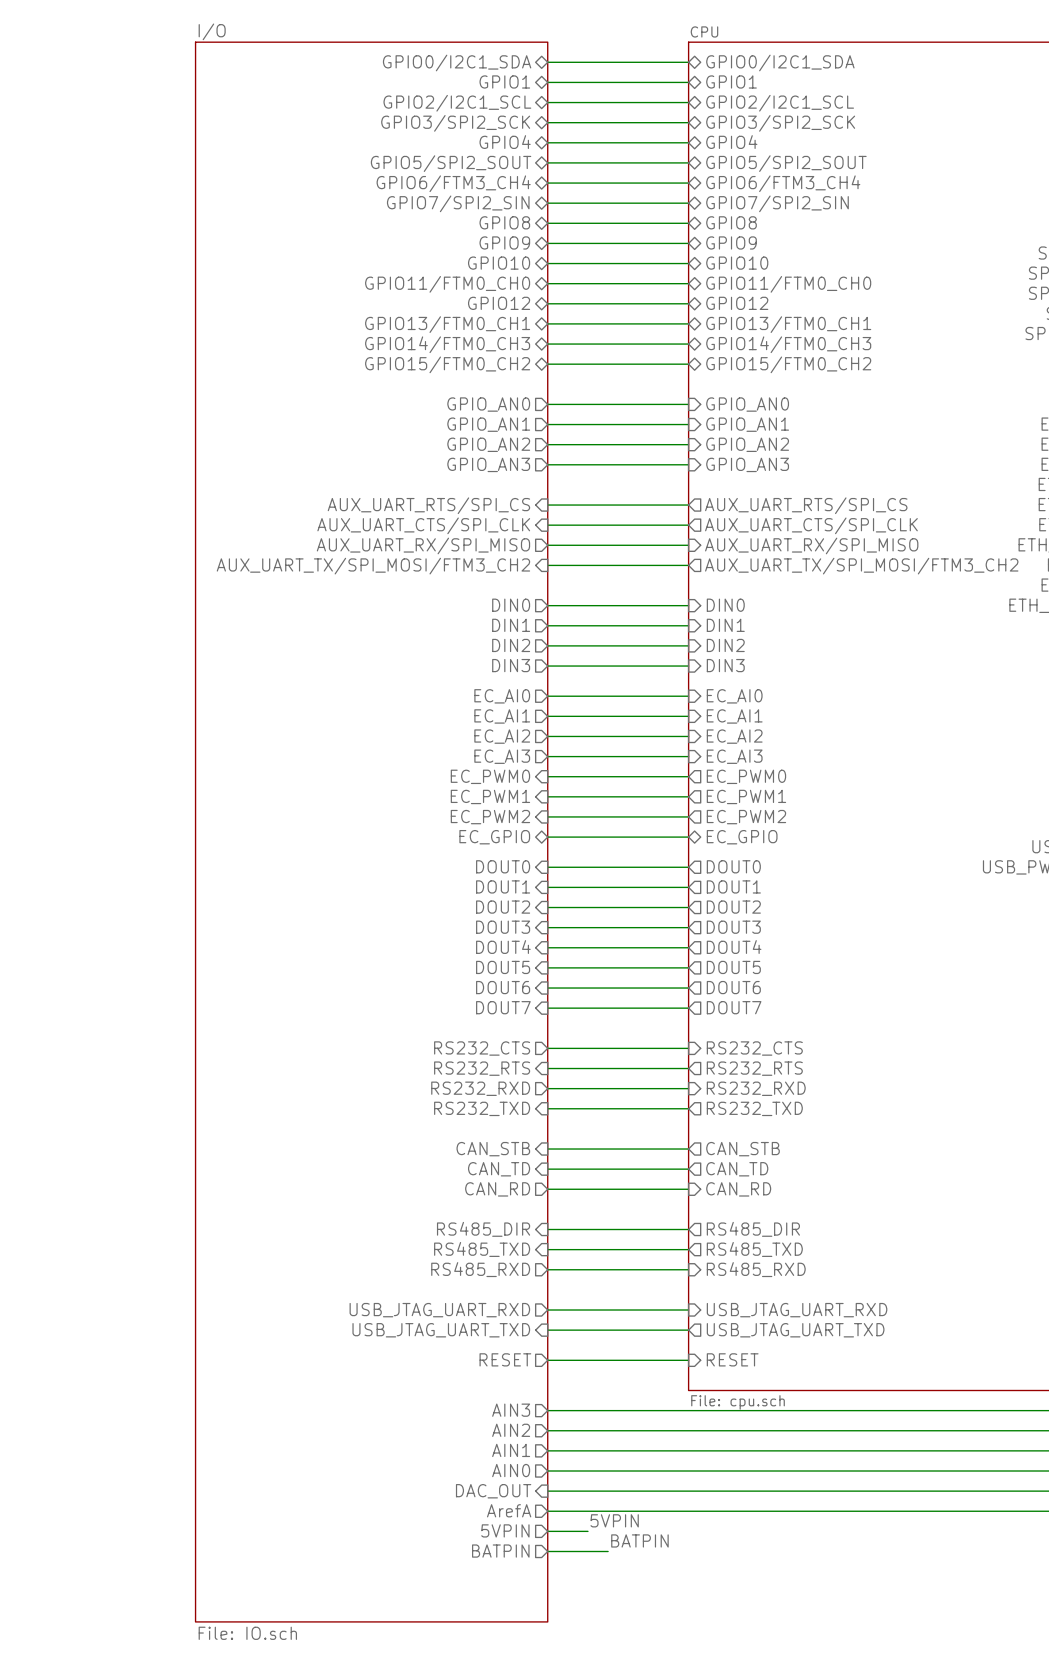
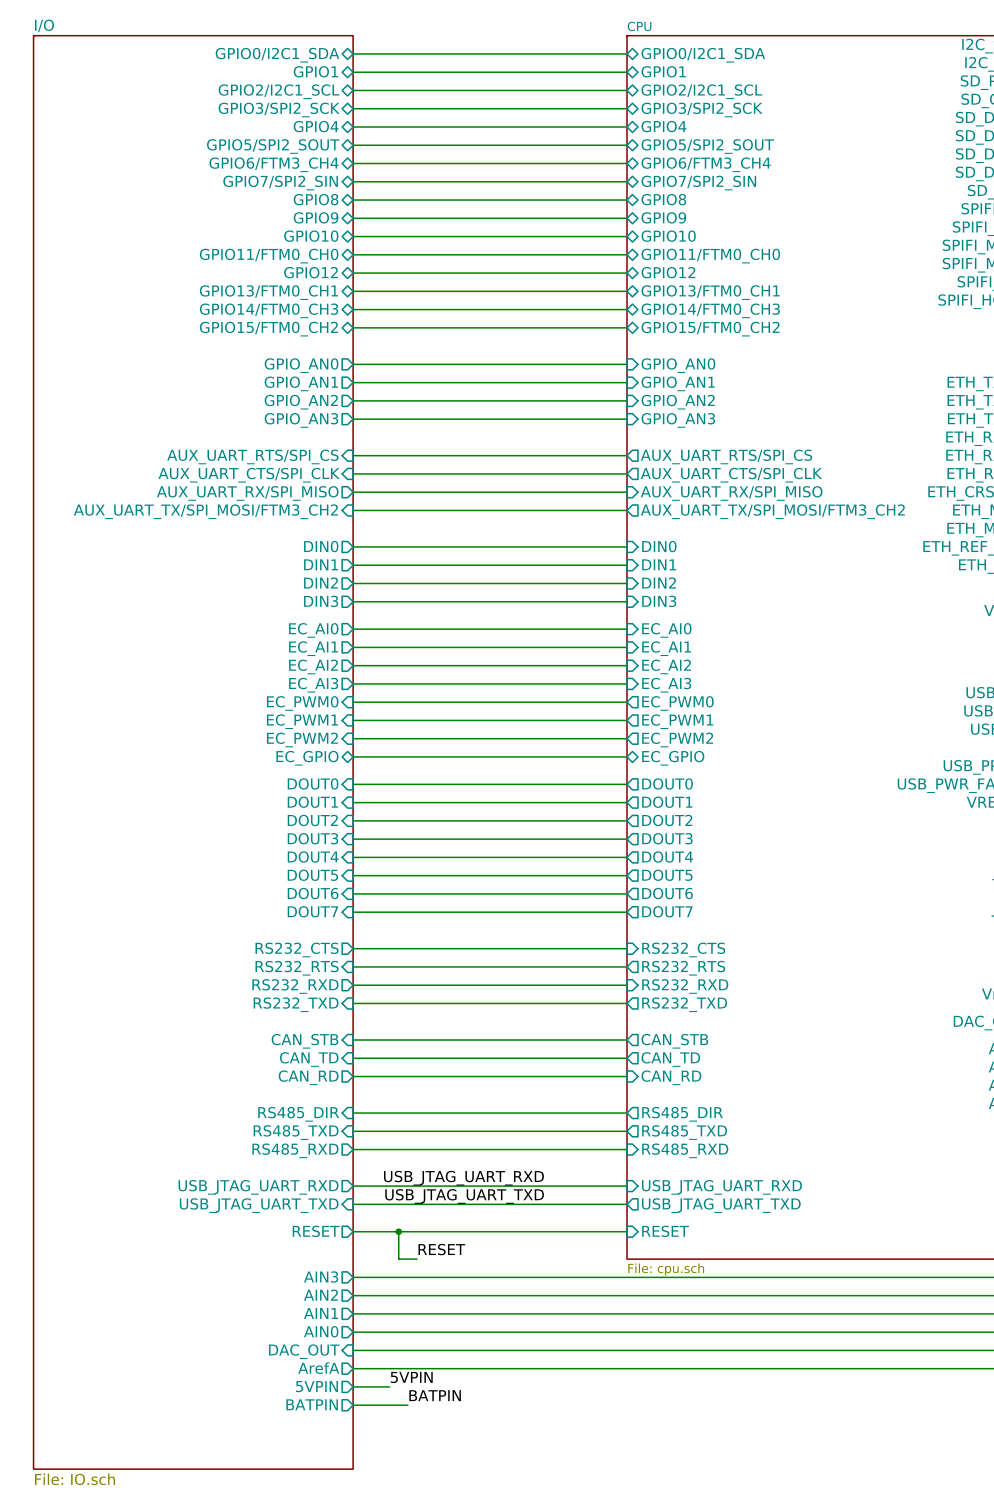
wire: none -> (353, 53) (499, 53)
sheet pin position: GPIO0/I2C1_SDA (457, 63) -> GPIO0/I2C1_SDA (277, 55)
sheet pin position: GPIO1 (504, 81) -> GPIO1 (315, 71)
wire: none -> (353, 72) (499, 72)
wire: none -> (353, 90) (499, 90)
sheet pin position: GPIO2/I2C1_SCL (457, 103) -> GPIO2/I2C1_SCL (279, 91)
wire: none -> (353, 108) (499, 108)
sheet pin position: GPIO3/SPI2_SCK (455, 123) -> GPIO3/SPI2_SCK (279, 109)
wire: none -> (353, 126) (499, 126)
sheet pin position: GPIO4 (505, 142) -> GPIO4 (316, 126)
wire: none -> (353, 145) (499, 145)
sheet pin position: GPIO5/SPI2_SOUT (451, 163) -> GPIO5/SPI2_SOUT (273, 146)
wire: none -> (353, 163) (499, 163)
sheet pin position: GPIO6/FTM3_CH4 (453, 183) -> GPIO6/FTM3_CH4 (274, 164)
wire: none -> (353, 181) (499, 181)
sheet pin position: GPIO7/SPI2_SIN (458, 203) -> GPIO7/SPI2_SIN (280, 183)
sheet pin position: GPIO8 (504, 222) -> GPIO8 (316, 199)
wire: none -> (353, 200) (499, 200)
sheet pin position: GPIO9 (504, 242) -> GPIO9 (316, 217)
wire: none -> (353, 218) (499, 218)
wire: none -> (353, 236) (499, 236)
sheet pin position: GPIO10 (499, 263) -> GPIO10 (311, 236)
wire: none -> (353, 254) (499, 254)
sheet pin position: GPIO11/FTM0_CH0 (447, 284) -> GPIO11/FTM0_CH0 (269, 256)
wire: none -> (353, 273) (499, 273)
sheet pin position: GPIO12 (499, 303) -> GPIO12 (311, 272)
wire: none -> (353, 291) (499, 291)
sheet pin position: GPIO13/FTM0_CH1 (447, 324) -> GPIO13/FTM0_CH1 (268, 292)
wire: none -> (353, 309) (499, 309)
sheet pin position: GPIO14/FTM0_CH3 (447, 344) -> GPIO14/FTM0_CH3 (269, 310)
wire: none -> (353, 327) (499, 327)
sheet pin position: GPIO15/FTM0_CH2 (447, 364) -> GPIO15/FTM0_CH2 (268, 329)
wire: none -> (353, 364) (499, 364)
sheet pin position: GPIO_AN0 (488, 404) -> GPIO_AN0 (301, 365)
wire: none -> (353, 382) (499, 382)
sheet pin position: GPIO_AN1 (488, 424) -> GPIO_AN1 (301, 383)
wire: none -> (353, 400) (499, 400)
sheet pin position: GPIO_AN2 (488, 444) -> GPIO_AN2 (301, 402)
wire: none -> (353, 419) (499, 419)
sheet pin position: GPIO_AN3 (488, 464) -> GPIO_AN3 (301, 420)
wire: none -> (353, 455) (499, 455)
sheet pin position: AUX_UART_RTS/SPI_CS (428, 505) -> AUX_UART_RTS/SPI_CS (252, 456)
wire: none -> (353, 473) (499, 473)
sheet pin position: AUX_UART_CTS/SPI_CLK (423, 525) -> AUX_UART_CTS/SPI_CLK (249, 475)
wire: none -> (353, 492) (499, 492)
sheet pin position: AUX_UART_RX/SPI_MISO (423, 545) -> AUX_UART_RX/SPI_MISO (247, 493)
wire: none -> (353, 510) (499, 510)
sheet pin position: AUX_UART_TX/SPI_MOSI/FTM3_CH2 (373, 566) -> AUX_UART_TX/SPI_MOSI/FTM3_CH2 (205, 511)
wire: none -> (353, 546) (499, 546)
sheet pin position: DIN0 (511, 605) -> DIN0 (321, 546)
wire: none -> (353, 565) (499, 565)
sheet pin position: DIN1 (511, 625) -> DIN1 (321, 564)
wire: none -> (353, 583) (499, 583)
sheet pin position: DIN2 (511, 645) -> DIN2 (320, 582)
sheet pin position: DIN3 (511, 665) -> DIN3 (321, 601)
wire: none -> (353, 601) (499, 601)
wire: none -> (353, 629) (499, 629)
sheet pin position: EC_AI0 (502, 696) -> EC_AI0 (313, 630)
wire: none -> (353, 647) (499, 647)
sheet pin position: EC_AI1 (502, 716) -> EC_AI1 (313, 648)
wire: none -> (353, 665) (499, 665)
sheet pin position: EC_AI2 (502, 736) -> EC_AI2 (313, 666)
wire: none -> (353, 683) (499, 683)
sheet pin position: EC_AI3 (502, 756) -> EC_AI3 (313, 685)
wire: none -> (353, 702) (499, 702)
sheet pin position: EC_PWM0 (490, 776) -> EC_PWM0 (302, 703)
wire: none -> (353, 720) (499, 720)
sheet pin position: EC_PWM1 (490, 796) -> EC_PWM1 (302, 721)
wire: none -> (353, 738) (499, 738)
sheet pin position: EC_PWM2 (490, 817) -> EC_PWM2 (302, 739)
sheet I/O position: (371, 832) -> (193, 752)
wire: none -> (353, 756) (499, 756)
sheet pin position: EC_GPIO (494, 837) -> EC_GPIO (307, 758)
sheet pin position: DOUT0 (503, 866) -> DOUT0 (313, 783)
wire: none -> (353, 784) (499, 784)
sheet pin position: DOUT1 (503, 886) -> DOUT1 (312, 802)
wire: none -> (353, 802) (499, 802)
wire: none -> (353, 820) (499, 820)
sheet pin position: DOUT2 (503, 907) -> DOUT2 (312, 820)
wire: none -> (353, 839) (499, 839)
sheet pin position: DOUT3 (503, 927) -> DOUT3 (312, 838)
wire: none -> (353, 857) (499, 857)
sheet pin position: DOUT4 (503, 947) -> DOUT4 (313, 856)
wire: none -> (353, 875) (499, 875)
sheet pin position: DOUT5 (503, 967) -> DOUT5 (312, 875)
sheet pin position: DOUT6 (503, 987) -> DOUT6 (313, 893)
wire: none -> (353, 893) (499, 893)
sheet pin position: DOUT7 (503, 1007) -> DOUT7 (312, 911)
wire: none -> (353, 912) (499, 912)
wire: none -> (353, 948) (499, 948)
sheet pin position: RS232_CTS (482, 1048) -> RS232_CTS (297, 949)
wire: none -> (353, 966) (499, 966)
sheet pin position: RS232_RTS (482, 1068) -> RS232_RTS (297, 968)
wire: none -> (353, 985) (499, 985)
sheet pin position: RS232_RXD (480, 1088) -> RS232_RXD (295, 986)
wire: none -> (353, 1003) (499, 1003)
sheet pin position: RS232_TXD (482, 1108) -> RS232_TXD (296, 1004)
wire: none -> (353, 1040) (499, 1040)
sheet pin position: CAN_STB (493, 1149) -> CAN_STB (305, 1041)
wire: none -> (353, 1058) (499, 1058)
sheet pin position: CAN_TD (499, 1169) -> CAN_TD (309, 1059)
wire: none -> (353, 1076) (499, 1076)
sheet pin position: CAN_RD (497, 1189) -> CAN_RD (308, 1077)
wire: none -> (353, 1113) (499, 1113)
sheet pin position: RS485_DIR (483, 1229) -> RS485_DIR (298, 1114)
wire: none -> (353, 1131) (499, 1131)
sheet pin position: RS485_TXD (482, 1249) -> RS485_TXD (296, 1132)
wire: none -> (353, 1149) (499, 1149)
sheet pin position: RS485_RXD (480, 1269) -> RS485_RXD (295, 1150)
label: none -> USB_JTAG_UART_RXD (463, 1178)
wire: none -> (353, 1186) (499, 1186)
sheet pin position: USB_JTAG_UART_RXD (439, 1310) -> USB_JTAG_UART_RXD (258, 1187)
label: none -> USB_JTAG_UART_TXD (464, 1196)
wire: none -> (353, 1204) (499, 1204)
sheet pin position: USB_JTAG_UART_TXD (441, 1330) -> USB_JTAG_UART_TXD (259, 1205)
sheet pin position: RESET (505, 1359) -> RESET (316, 1231)
wire: none -> (353, 1231) (499, 1231)
wire: none -> (398, 1231) (398, 1259) (417, 1259)
junction: none -> (398, 1231)
label: none -> RESET (441, 1249)
wire: none -> (353, 1277) (499, 1277)
sheet pin position: AIN3 (511, 1410) -> AIN3 (321, 1276)
wire: none -> (353, 1295) (499, 1295)
sheet pin position: AIN2 (511, 1430) -> AIN2 (320, 1295)
wire: none -> (353, 1313) (499, 1313)
sheet pin position: AIN1 (511, 1450) -> AIN1 (321, 1313)
sheet pin position: AIN0 (511, 1470) -> AIN0 (321, 1331)
wire: none -> (353, 1332) (499, 1332)
wire: none -> (353, 1350) (499, 1350)
sheet pin position: DAC_OUT (493, 1491) -> DAC_OUT (304, 1351)
sheet pin position: ArefA (509, 1510) -> ArefA (318, 1368)
wire: none -> (353, 1368) (499, 1368)
label position: 5VPIN (614, 1520) -> 5VPIN (411, 1377)
sheet pin position: 5VPIN (505, 1530) -> 5VPIN (316, 1386)
wire: (547, 1531) (587, 1531) -> (353, 1386) (389, 1386)
label position: BATPIN (639, 1540) -> BATPIN (435, 1395)
sheet pin position: BATPIN (500, 1551) -> BATPIN (312, 1404)
wire: (547, 1551) (608, 1551) -> (353, 1405) (407, 1405)

